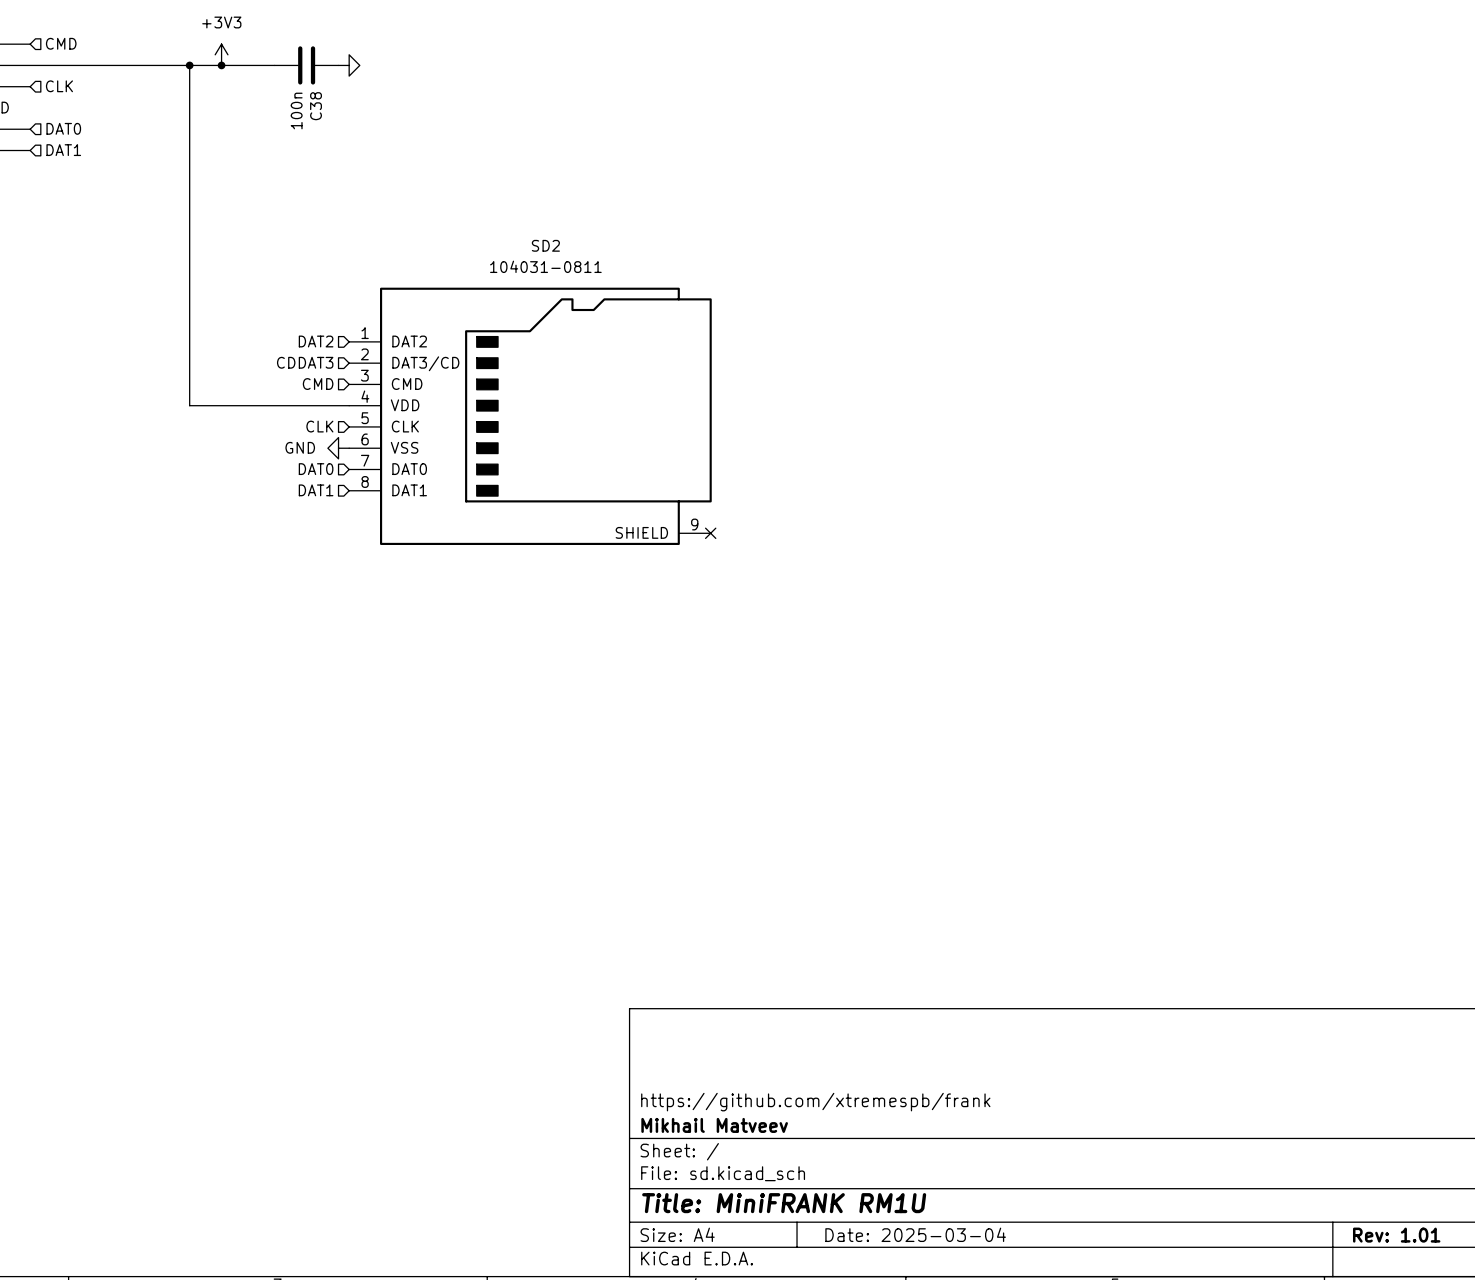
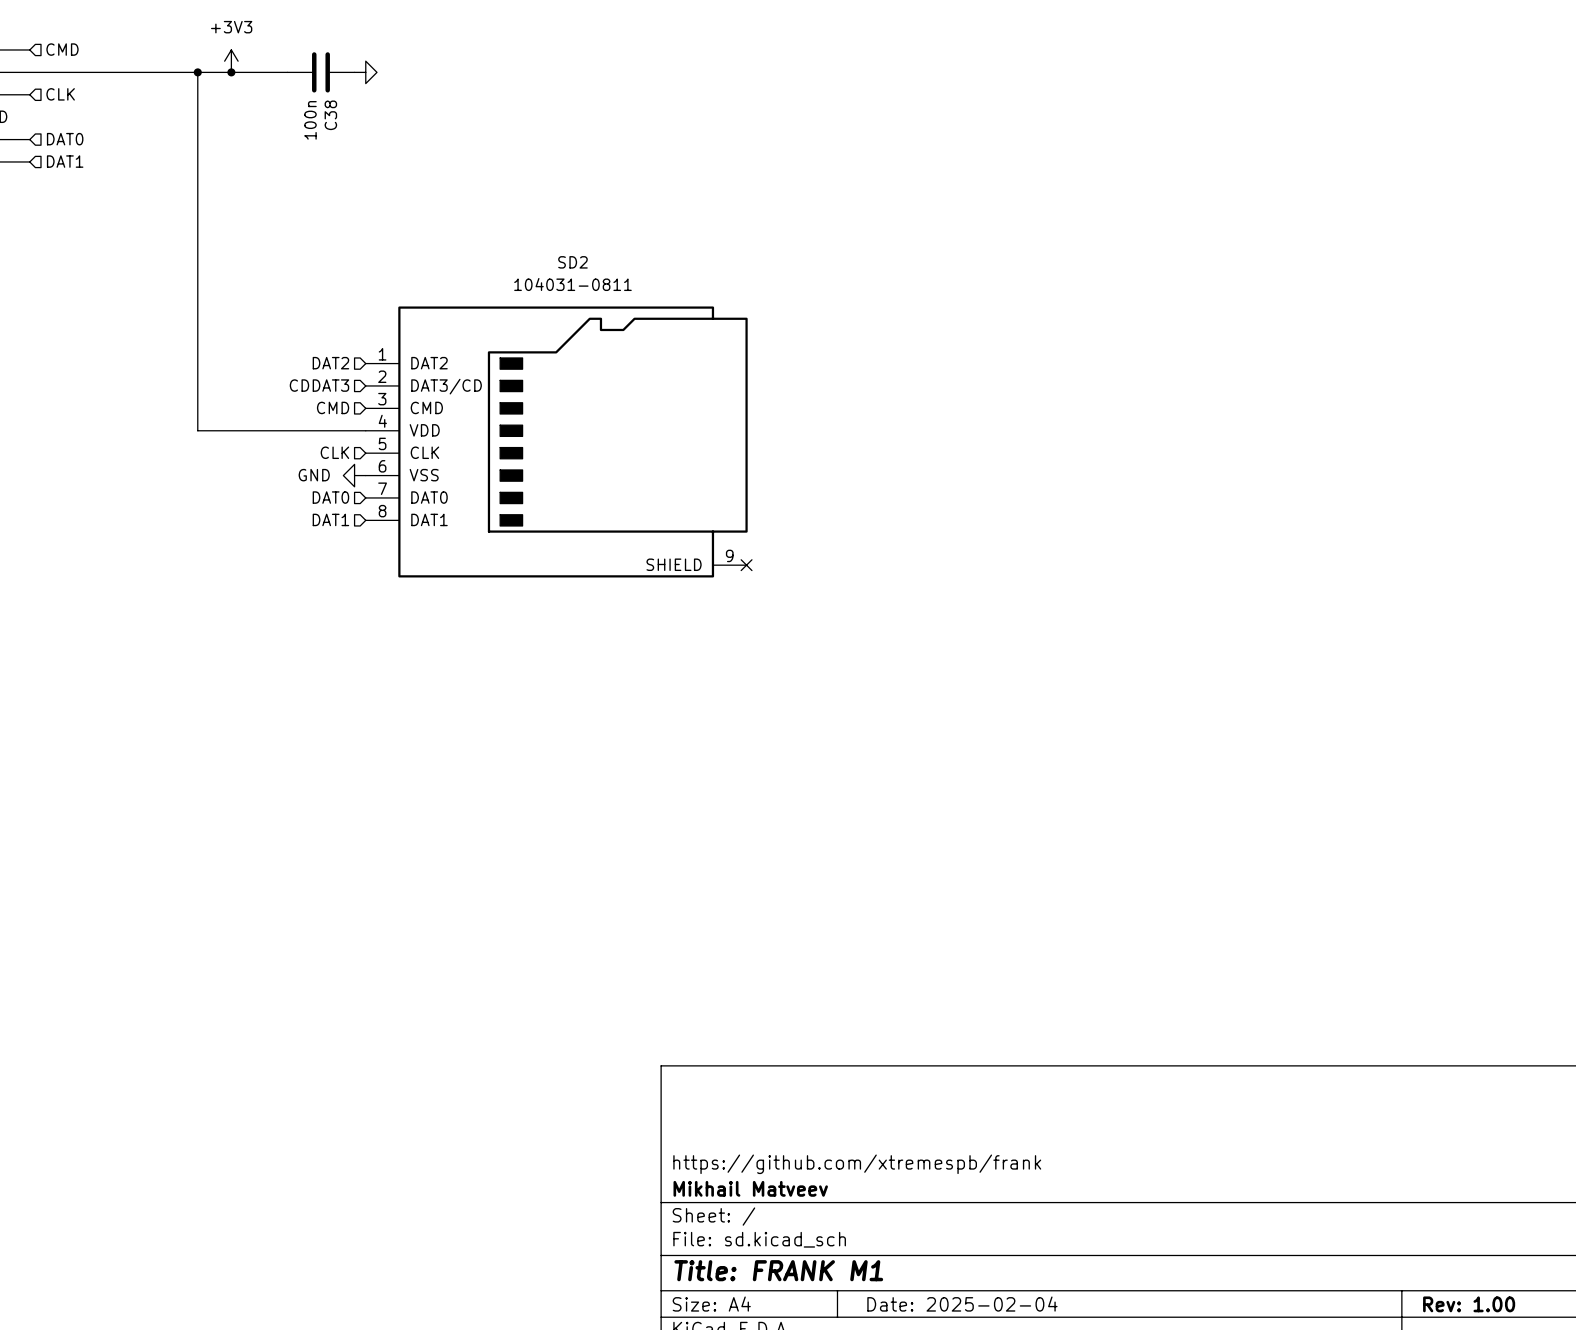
title block: Title: MiniFRANK RM1U (784, 1203) -> Title: FRANK M1 (778, 1270)
title block: Date: 2025-03-04 (915, 1234) -> Date: 2025-02-04 (962, 1304)
title block: Rev: 1.01 (1396, 1235) -> Rev: 1.00 (1469, 1304)

